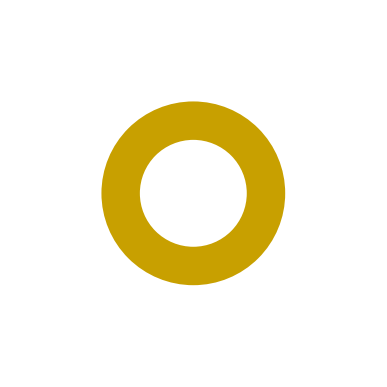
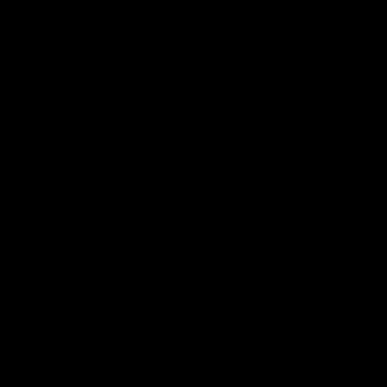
part: (193, 193) -> none

